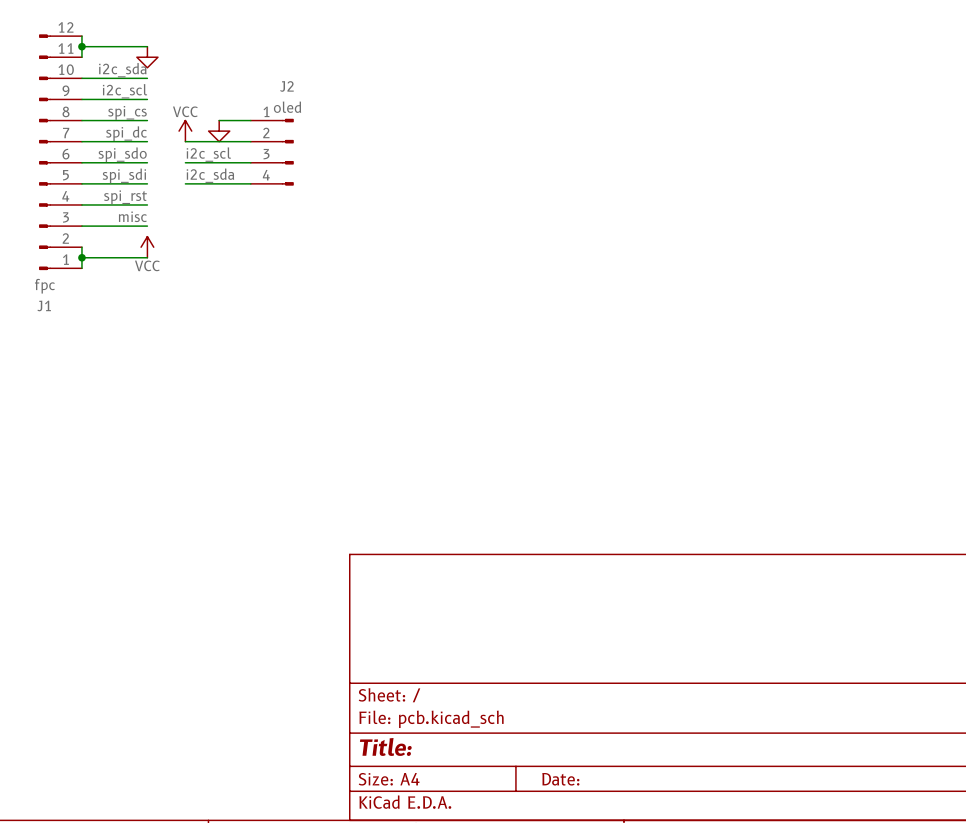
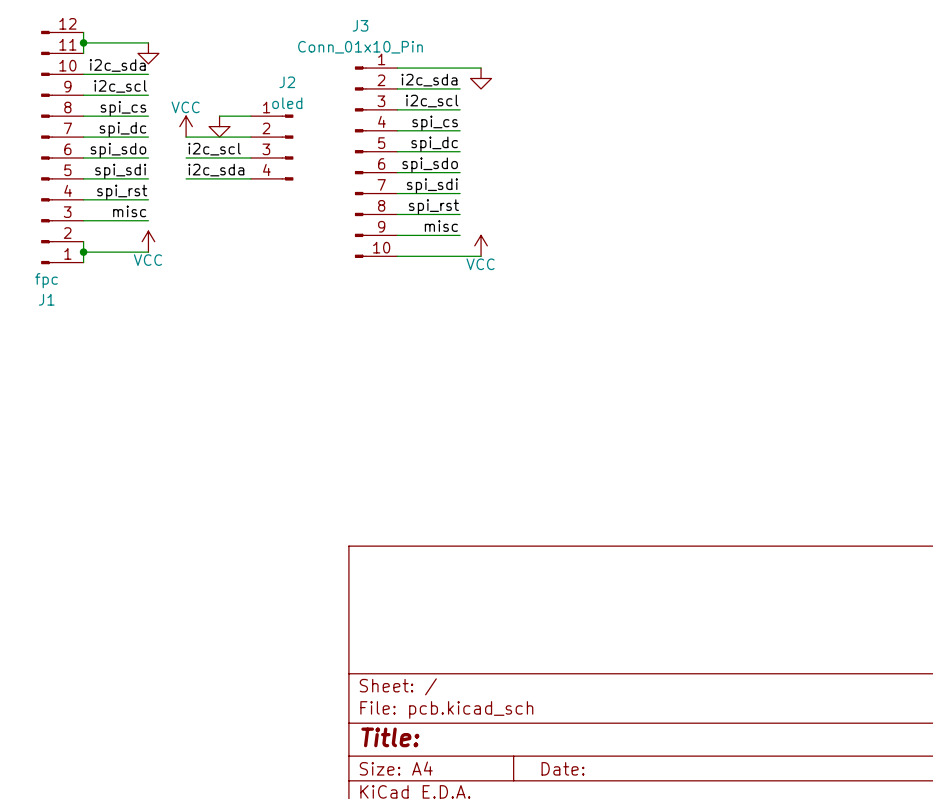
wire: none -> (397, 68) (481, 68)
power symbol: none -> (481, 78)
label: none -> i2c_sda (429, 80)
wire: none -> (397, 88) (460, 88)
label: none -> i2c_scl (432, 101)
wire: none -> (397, 109) (460, 109)
label: none -> spi_cs (435, 123)
wire: none -> (397, 130) (460, 130)
label: none -> spi_dc (434, 144)
wire: none -> (397, 151) (460, 151)
J3: none -> Conn_01x10_Pin (376, 162)
label: none -> spi_sdo (430, 165)
wire: none -> (397, 172) (460, 172)
label: none -> spi_sdi (432, 185)
wire: none -> (397, 193) (460, 193)
label: none -> spi_rst (433, 206)
wire: none -> (397, 214) (460, 214)
label: none -> misc (441, 226)
wire: none -> (397, 235) (460, 235)
power symbol: none -> VCC (481, 245)
wire: none -> (397, 256) (481, 256)

